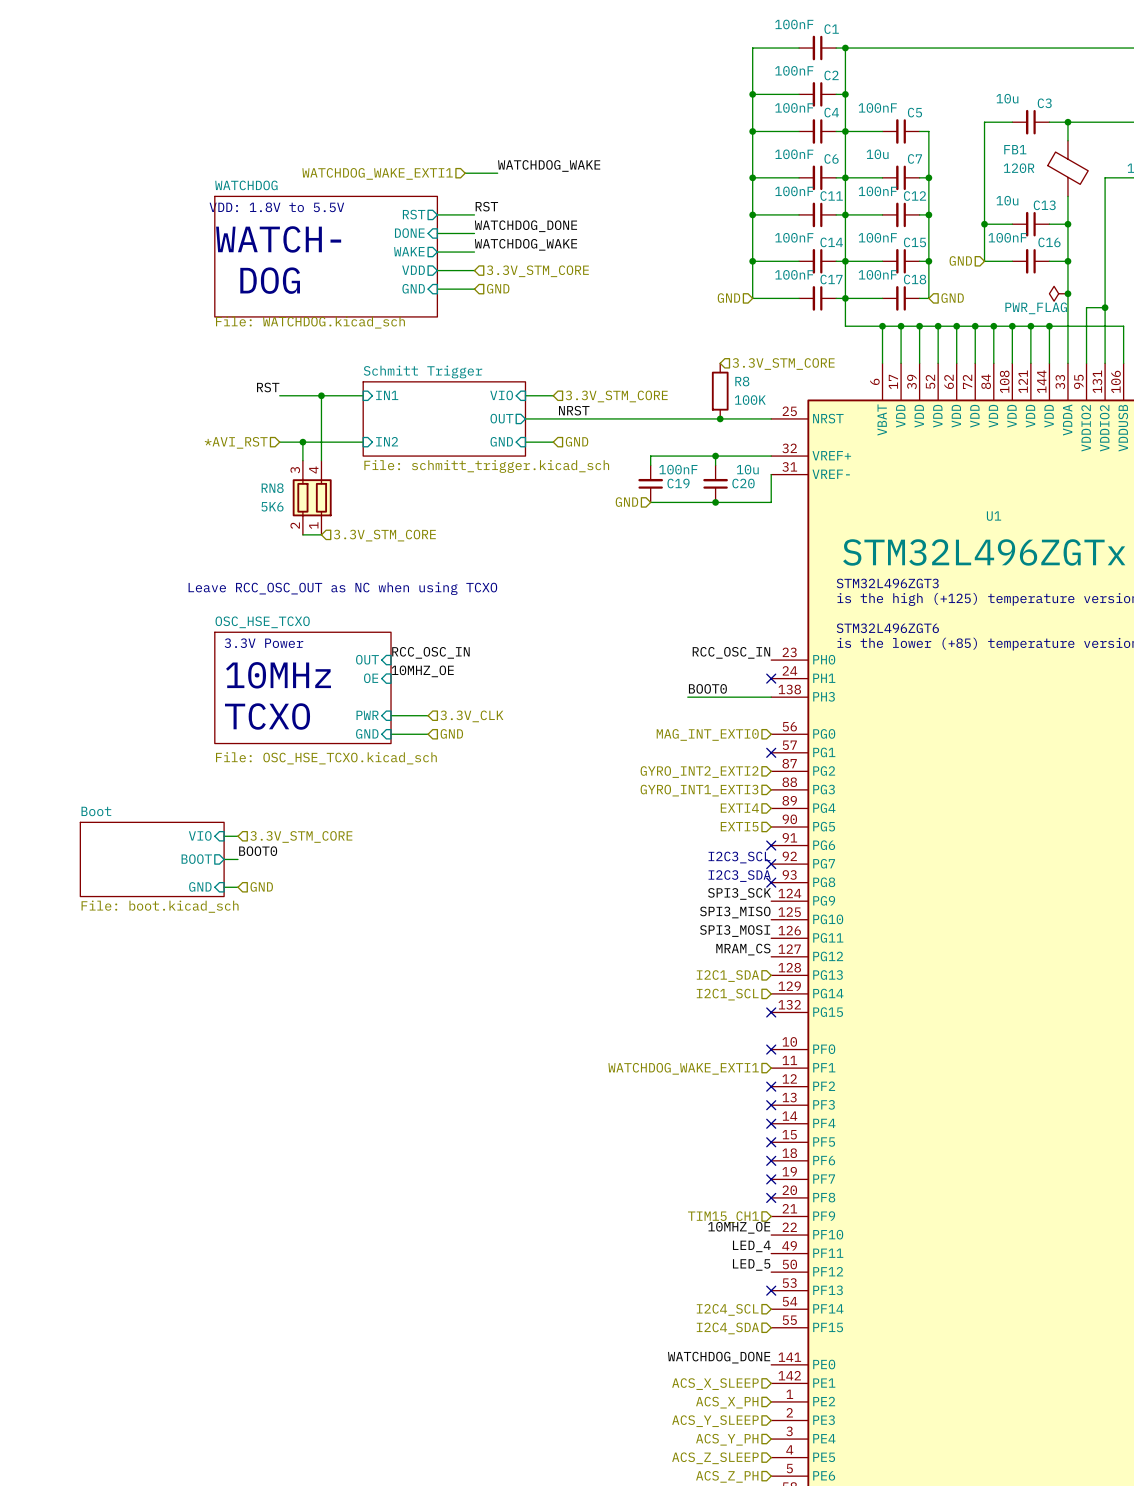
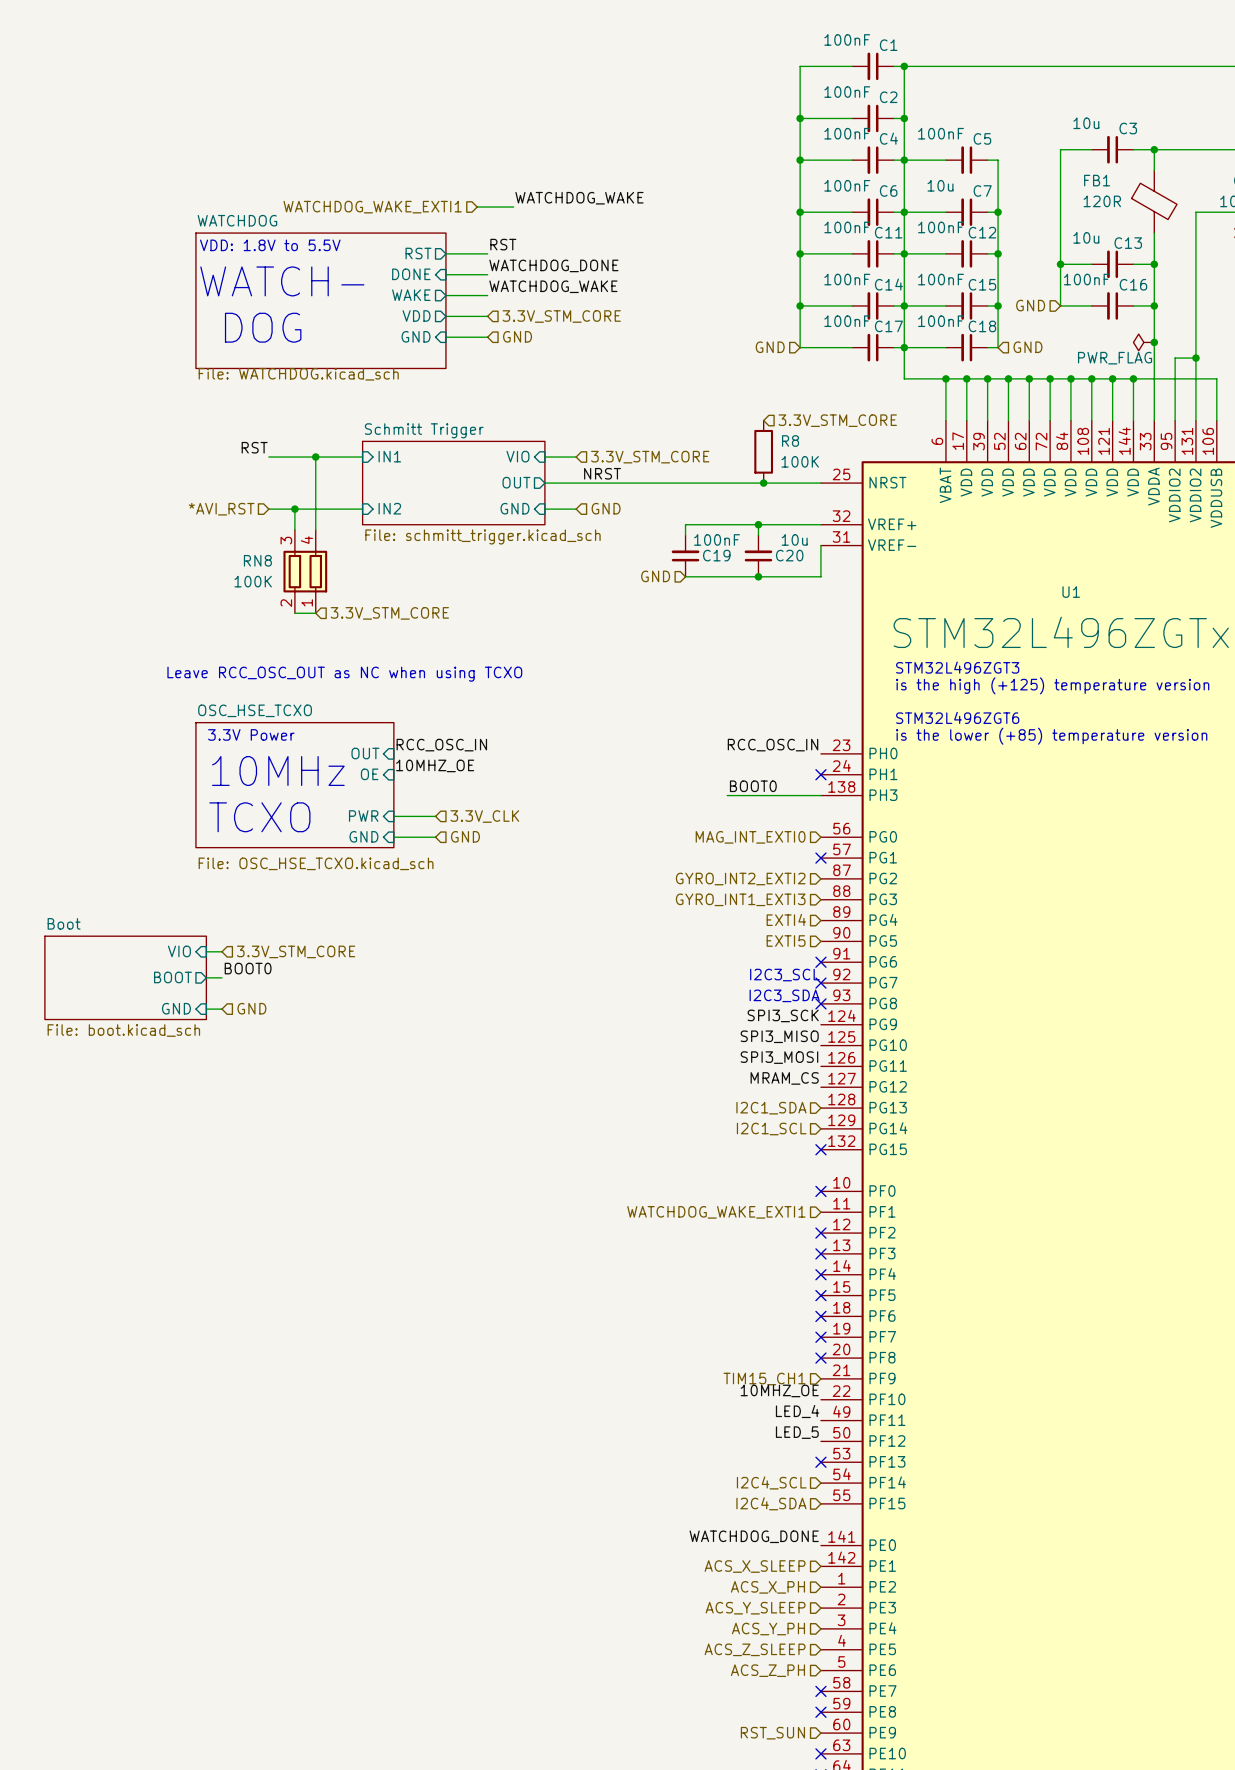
RN8 value: 5K6 (272, 506) -> 100K (253, 581)

